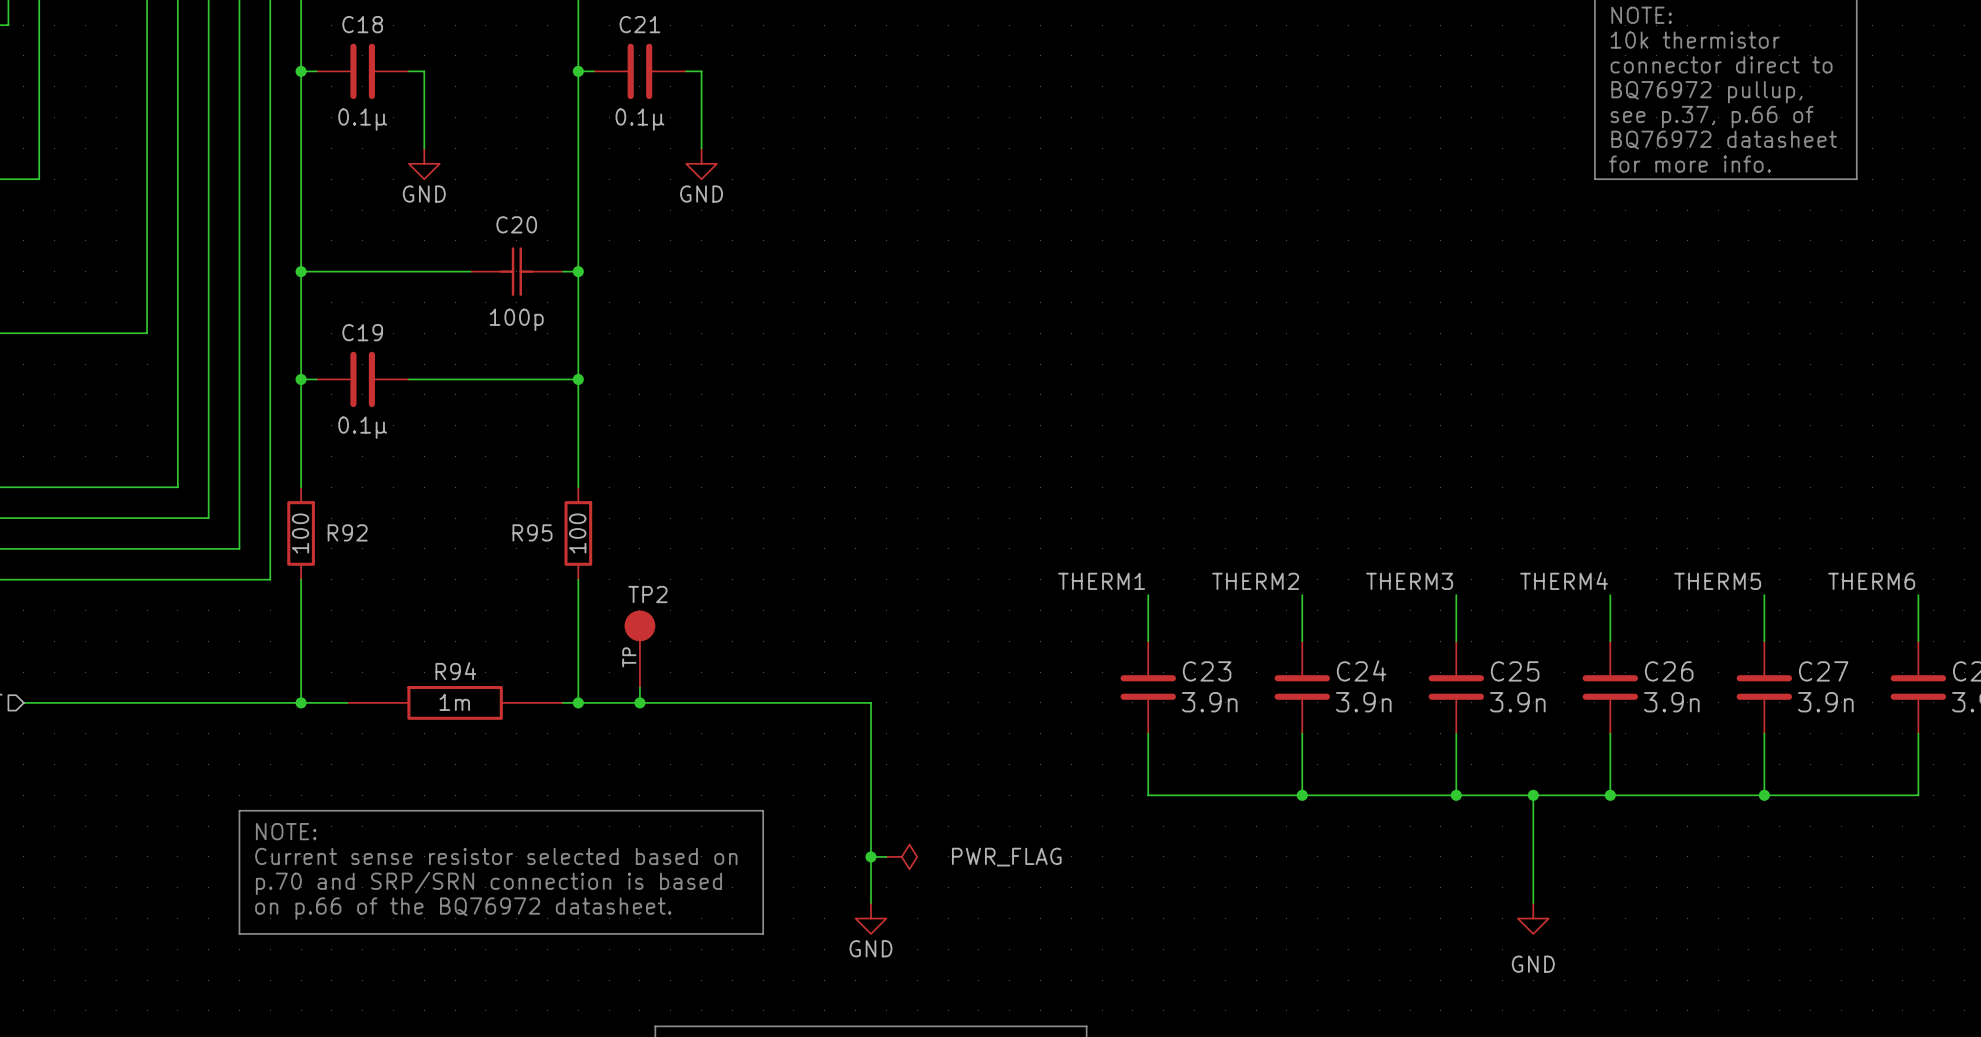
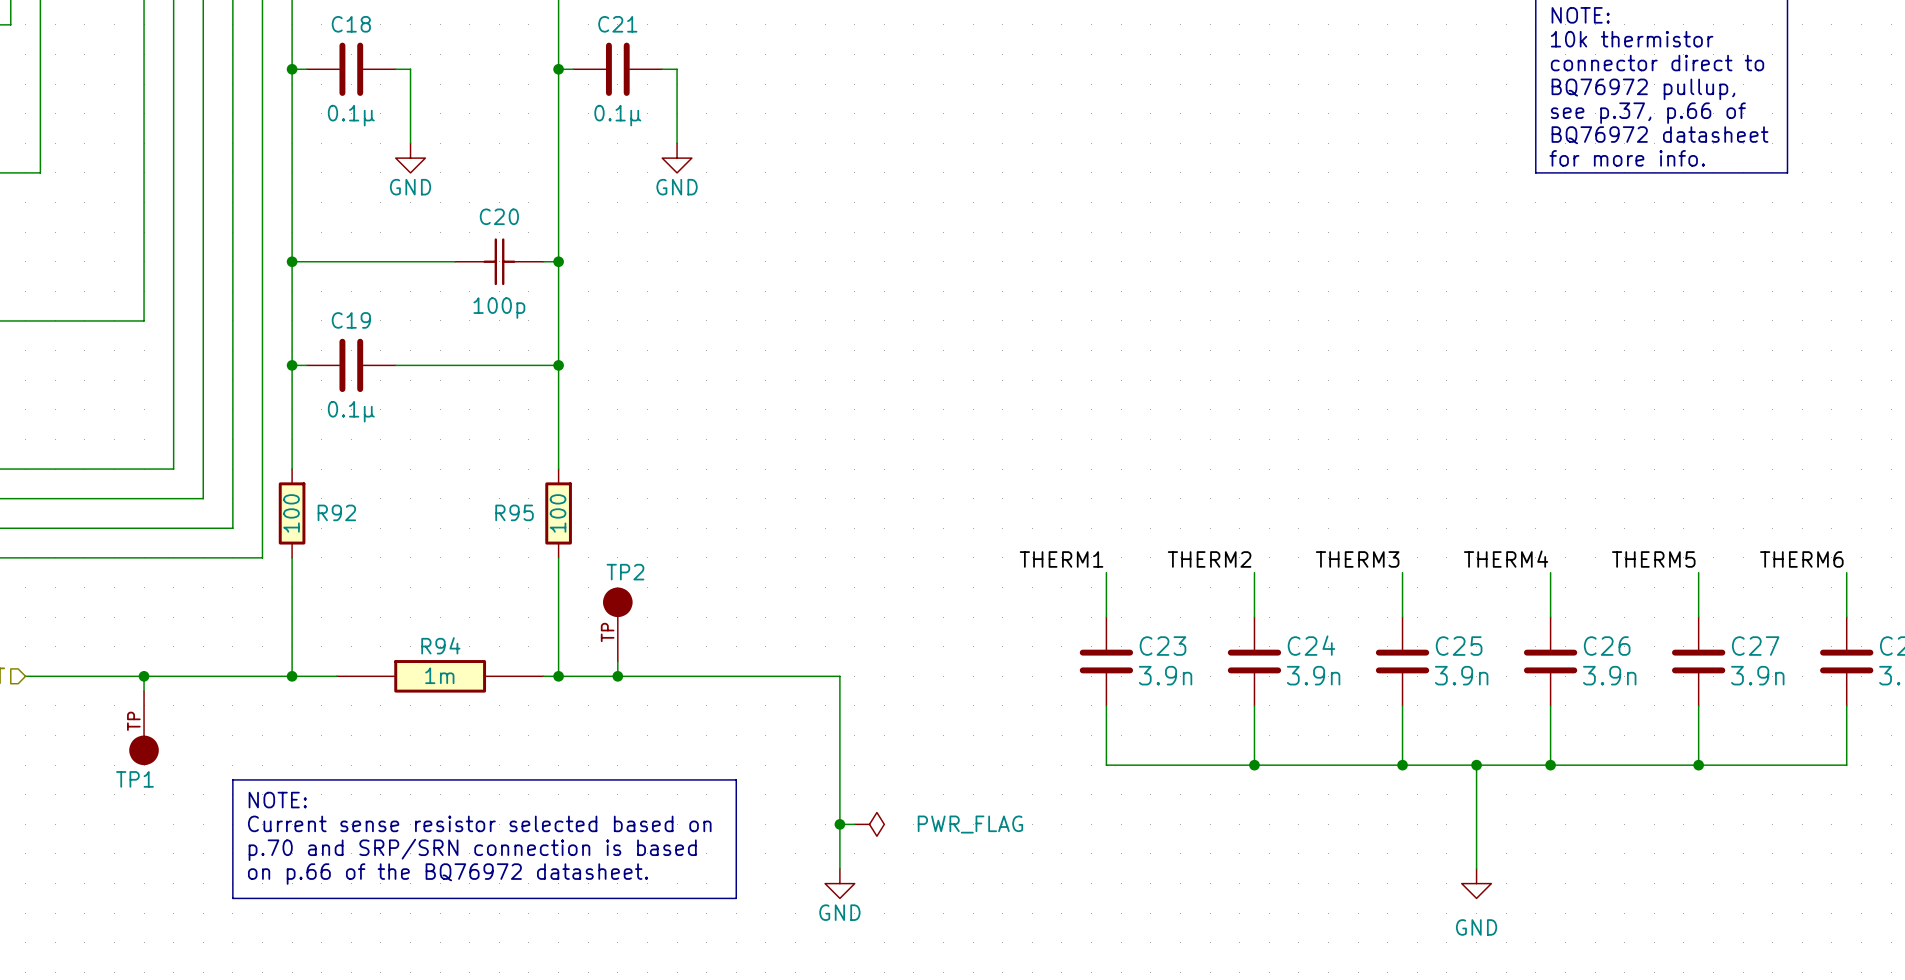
wire: none -> (144, 676) (144, 691)
junction: none -> (144, 676)
TP1: none -> (144, 728)

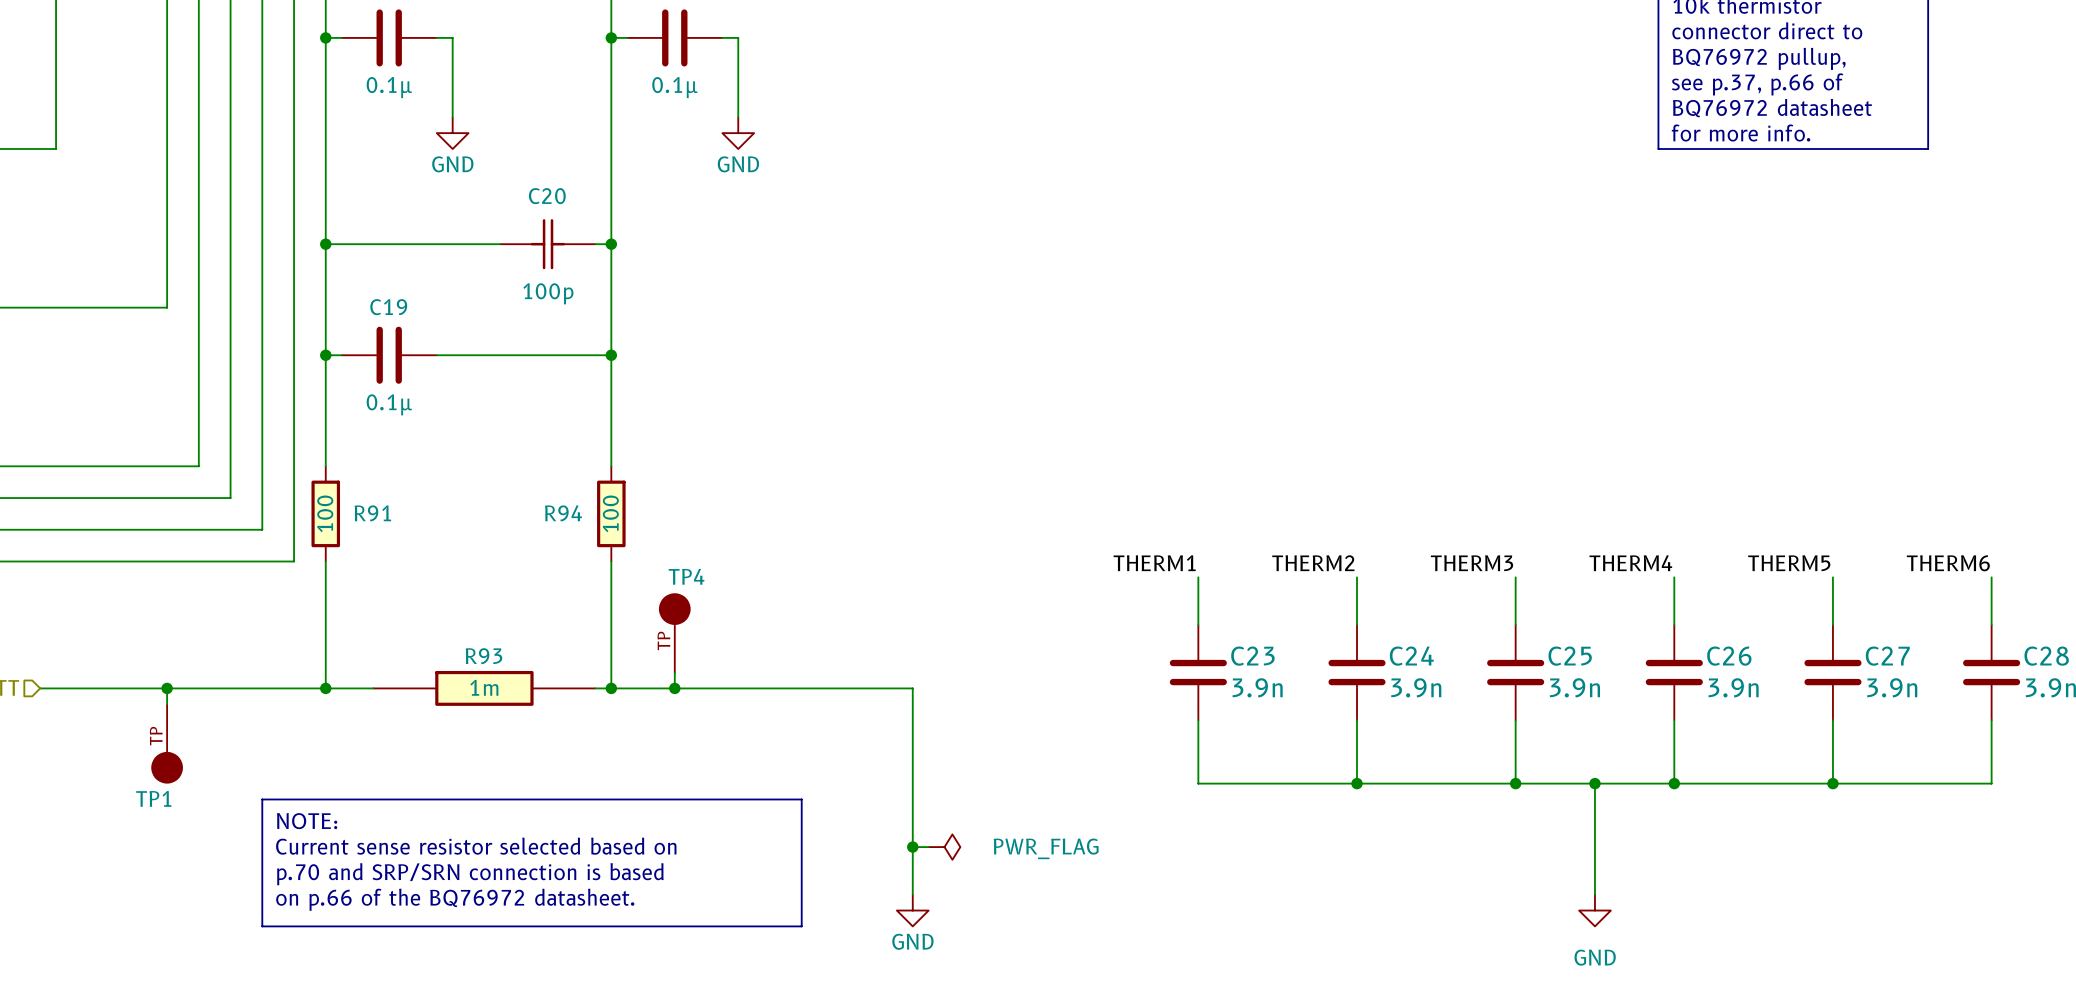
R92 name: R92 (336, 512) -> R91 (372, 513)
R95 name: R95 (514, 512) -> R94 (563, 513)
TP2 name: TP2 (625, 572) -> TP4 (686, 576)
R94 name: R94 (440, 645) -> R93 (483, 656)

